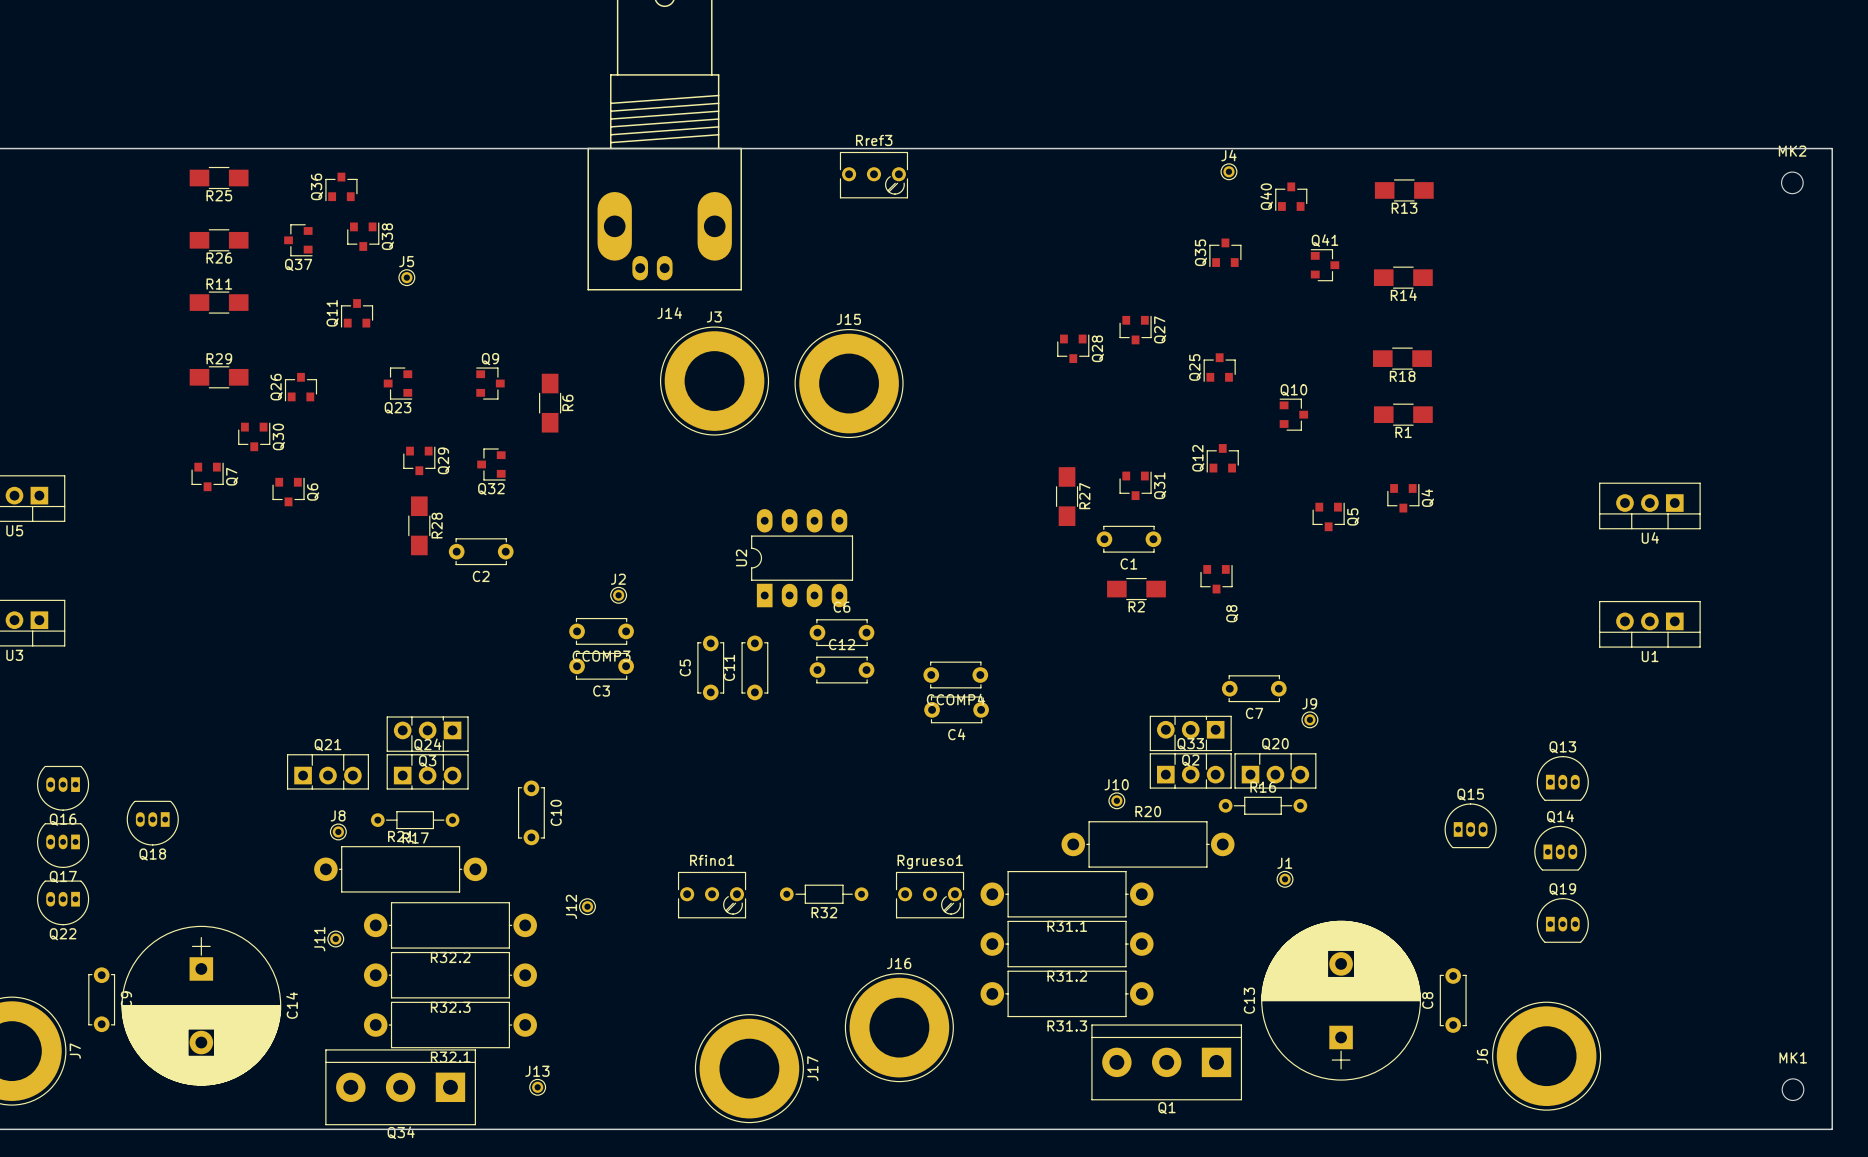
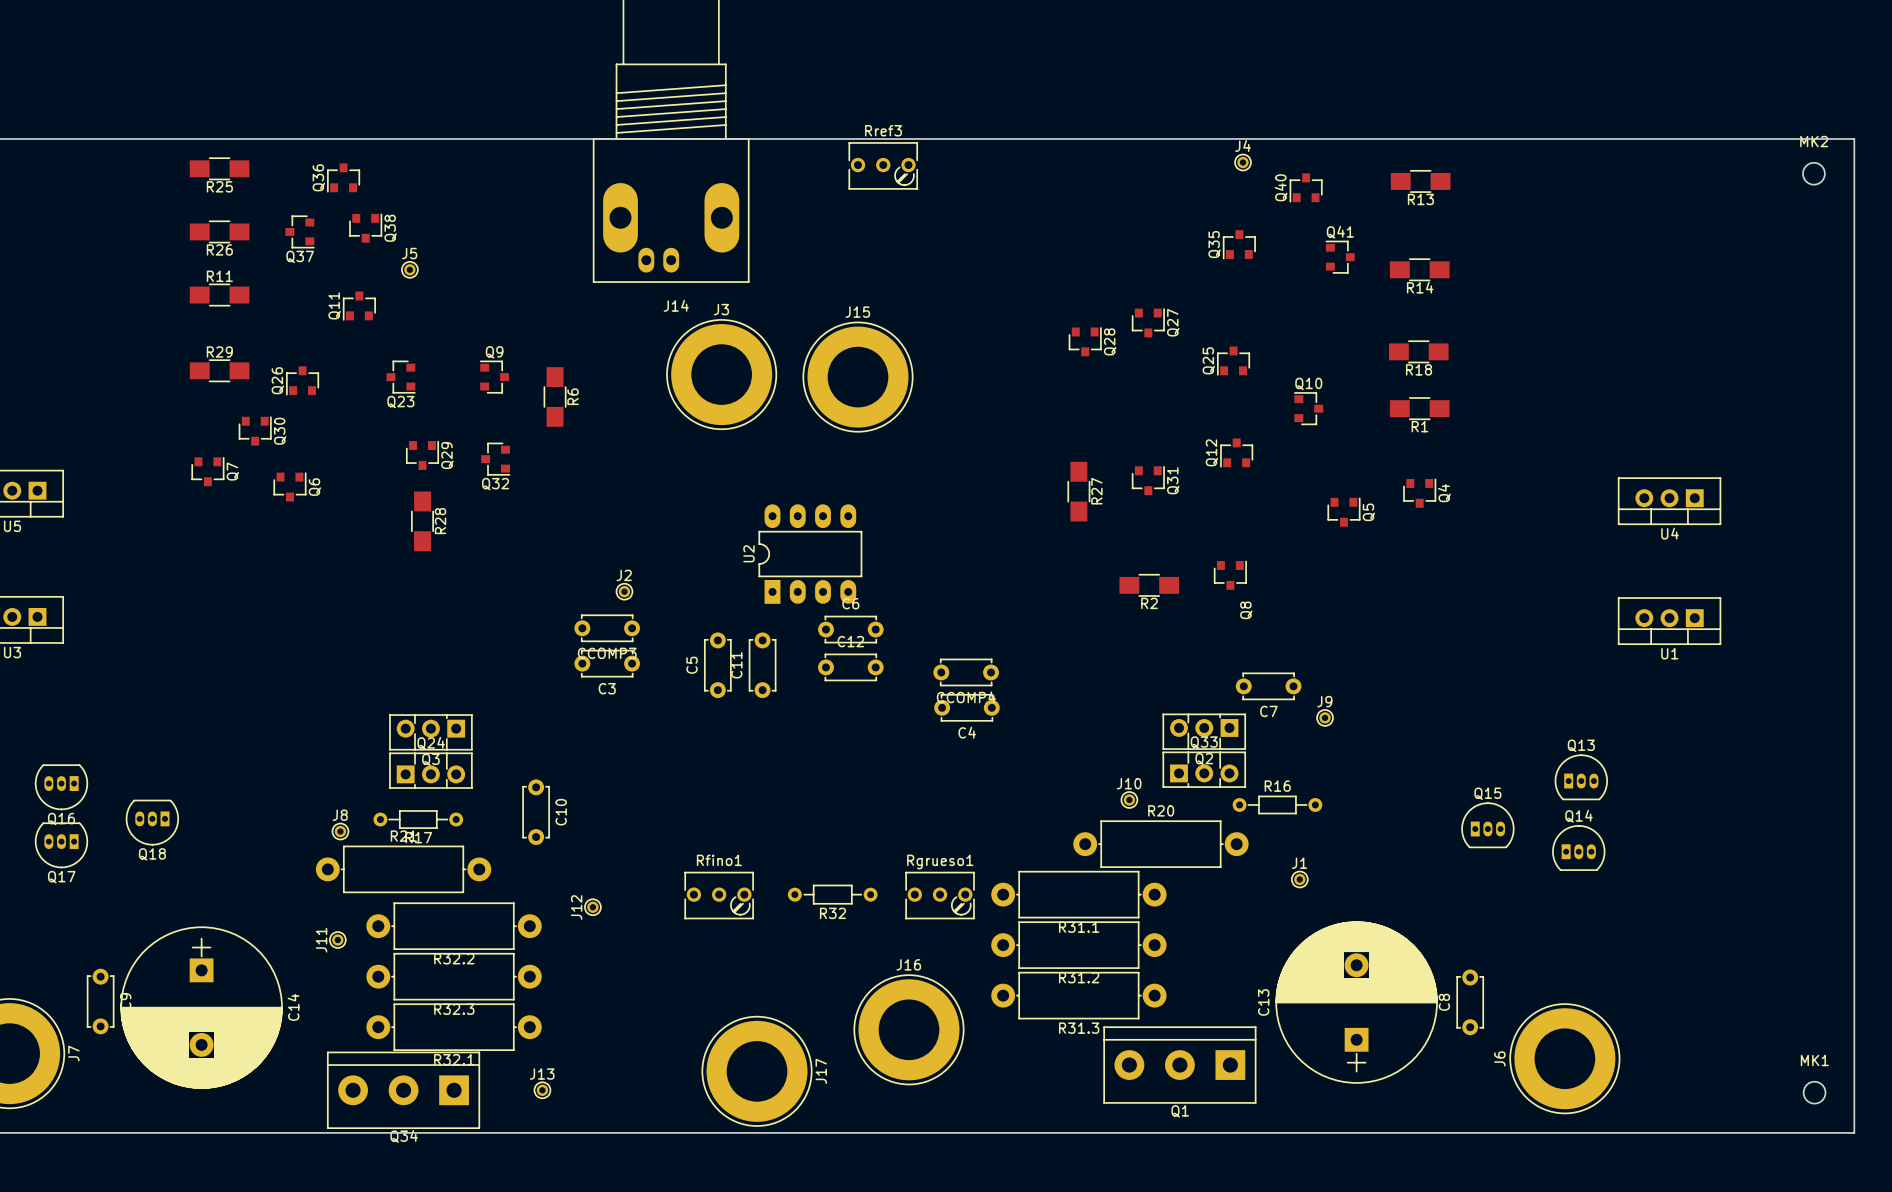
C1: (1128, 539) -> none
C2: (481, 551) -> none
Q20: (1275, 770) -> none
Q21: (327, 771) -> none
Q22: (63, 902) -> none
Q19: (1562, 920) -> none

